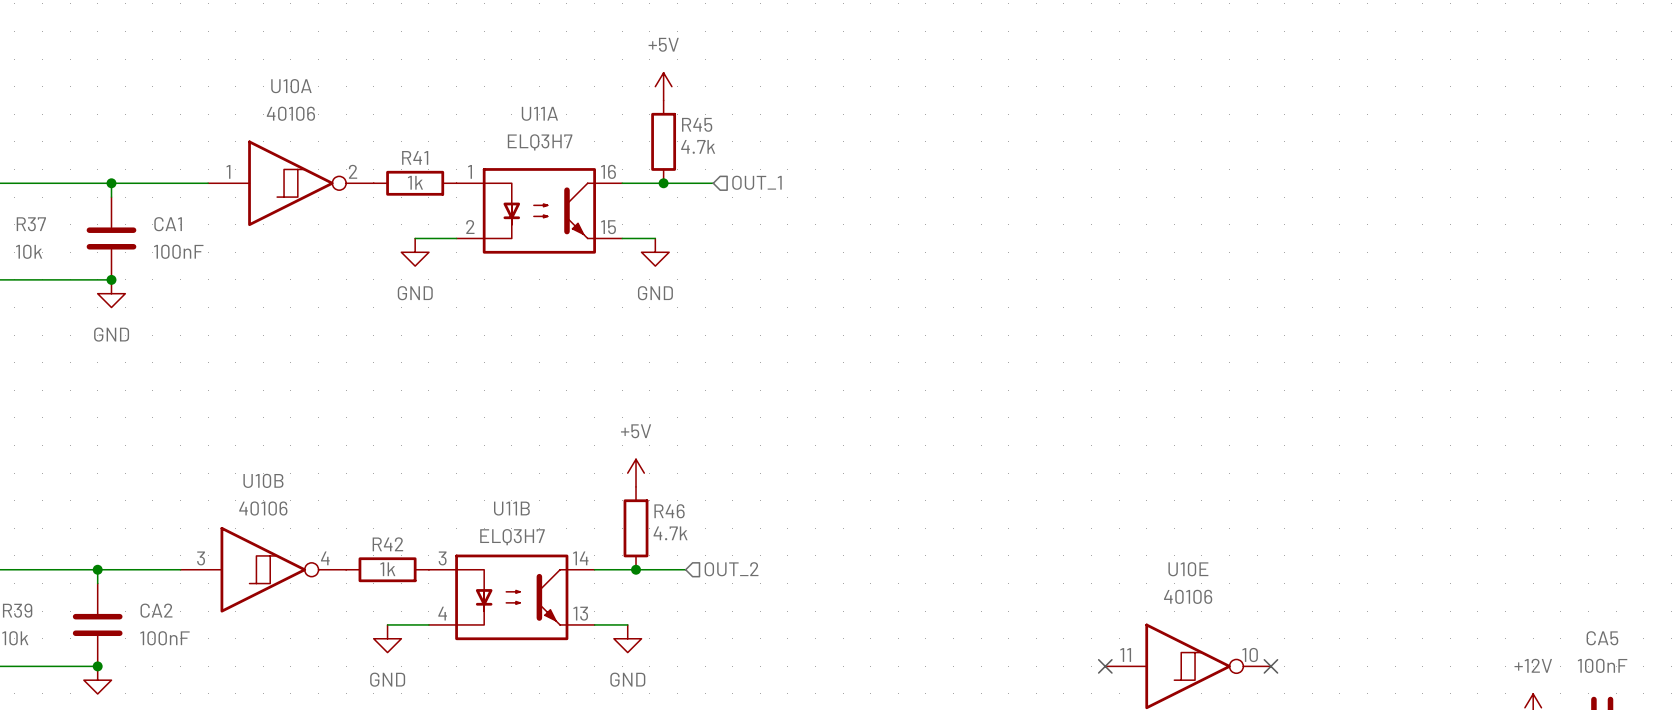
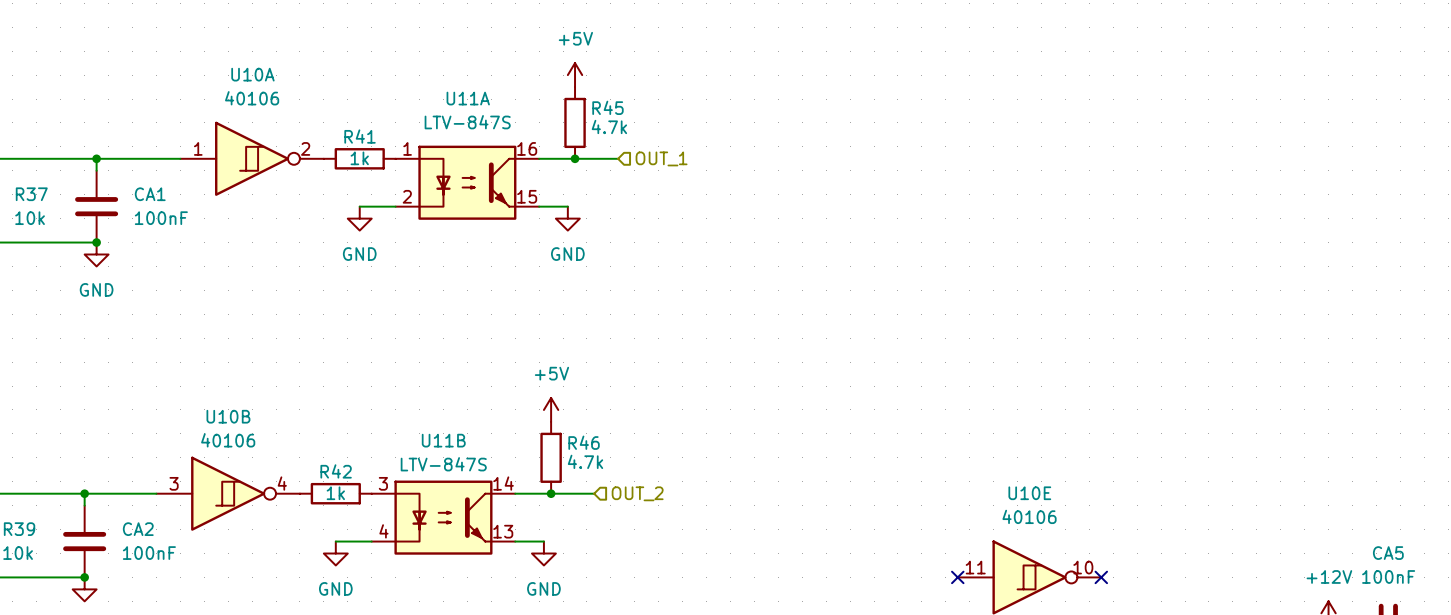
U11A value: ELQ3H7 (540, 142) -> LTV-847S (467, 122)
U11B value: ELQ3H7 (512, 537) -> LTV-847S (443, 464)

